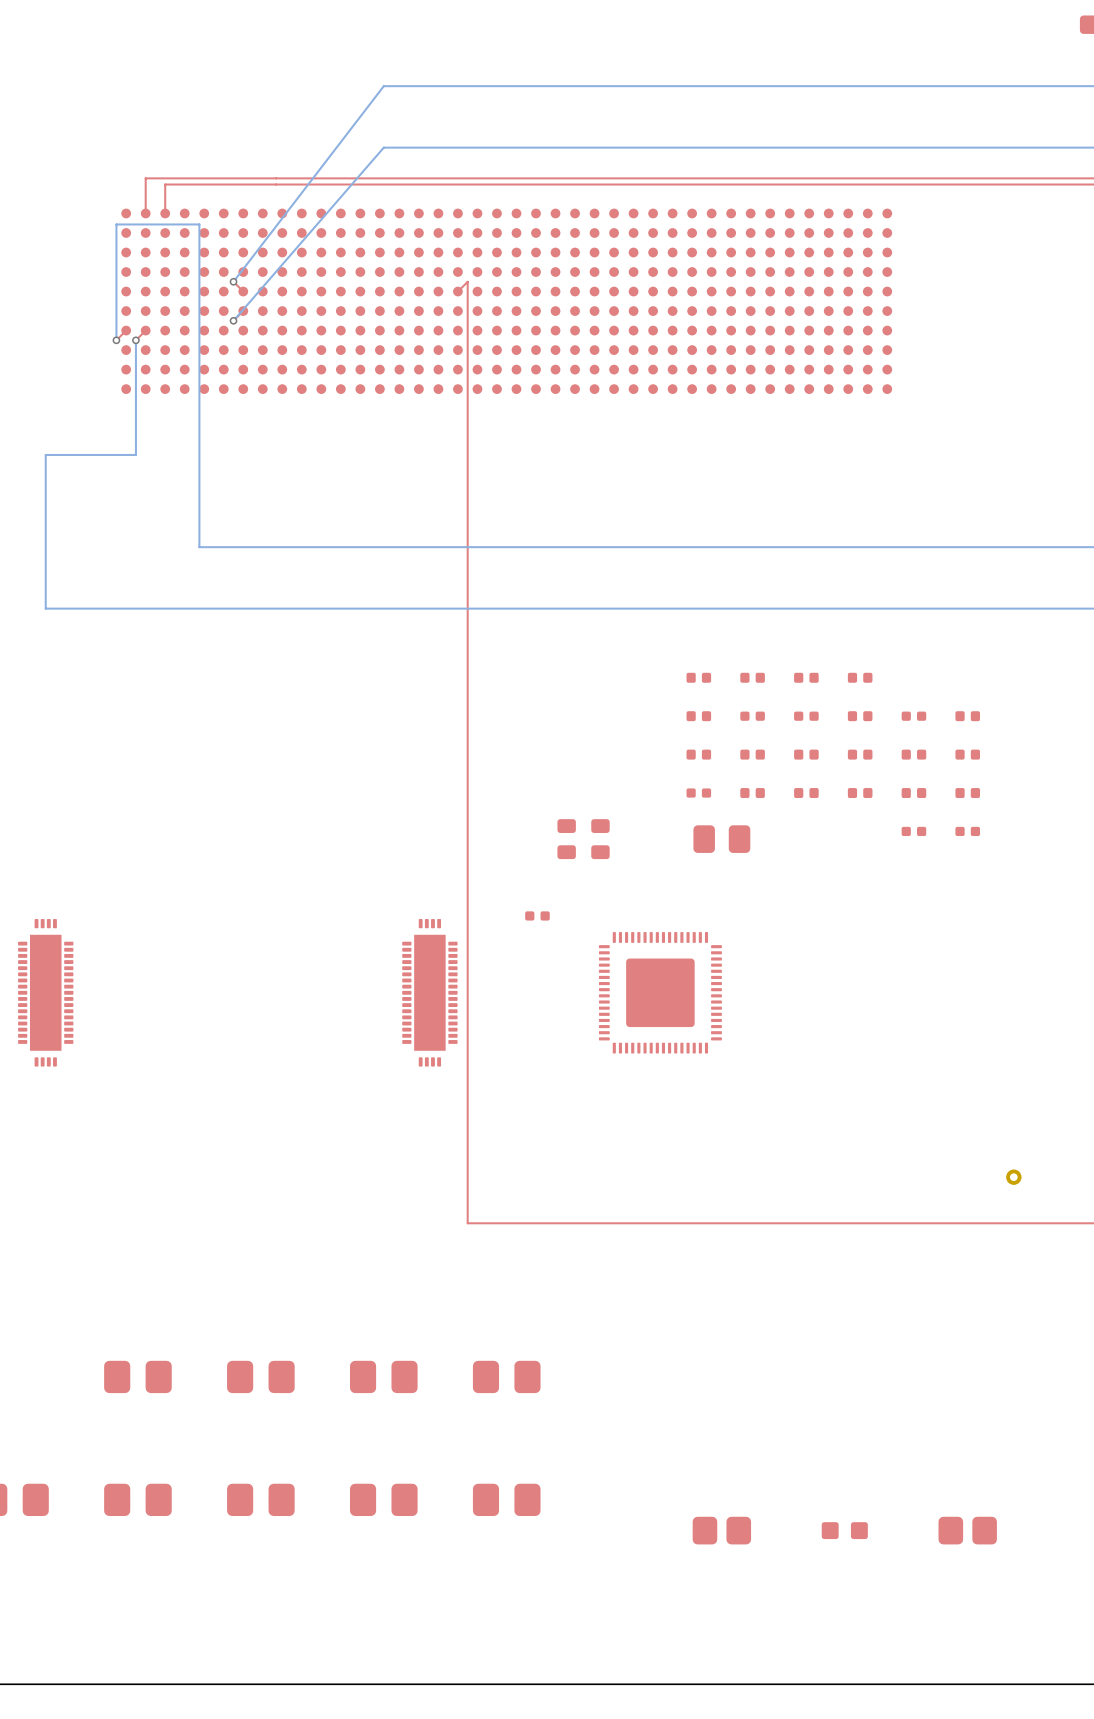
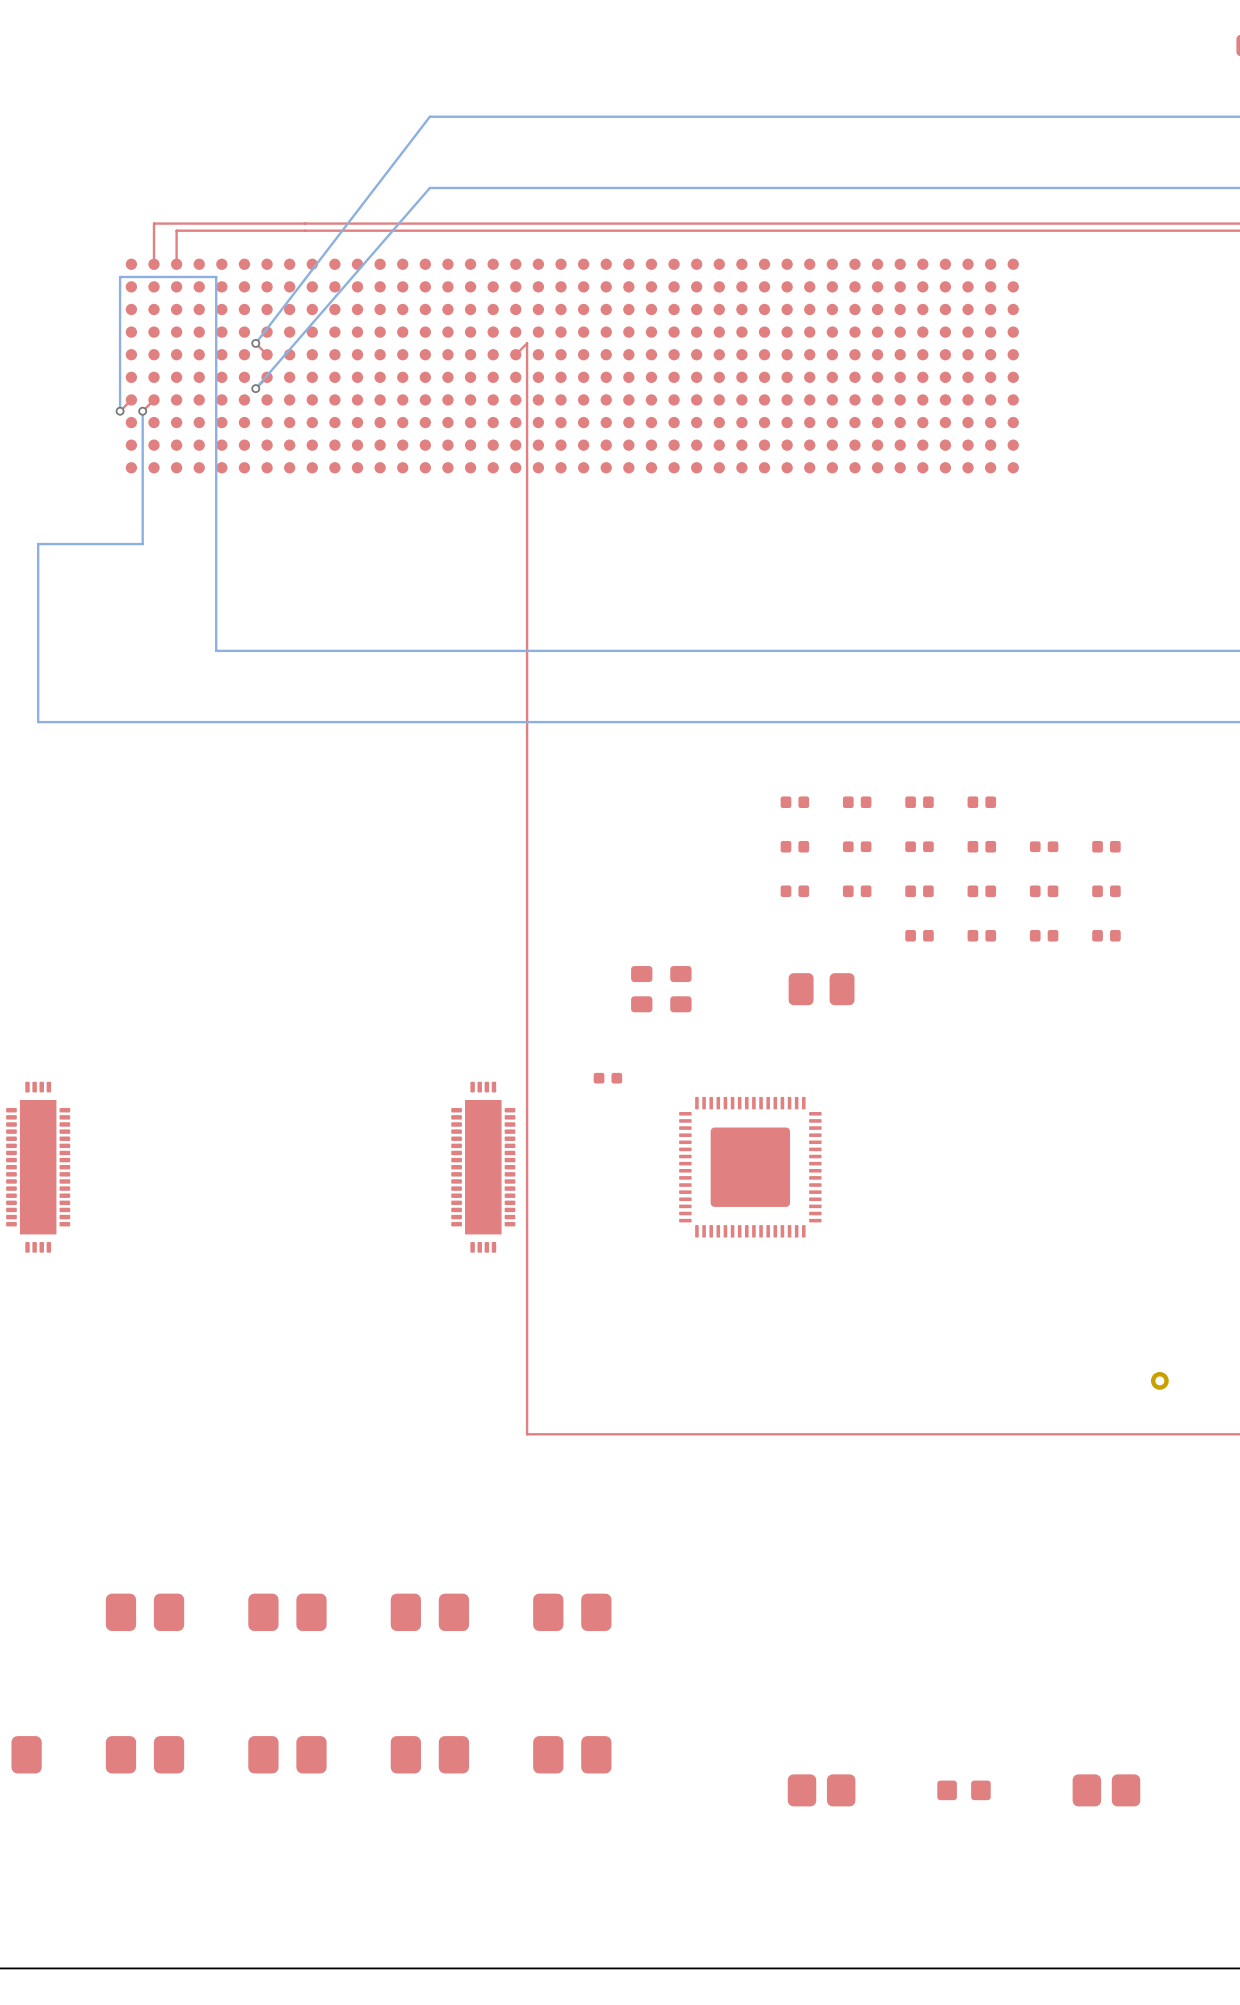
part: (698, 793) -> none
part: (752, 793) -> none
part: (913, 831) -> none
part: (967, 831) -> none

